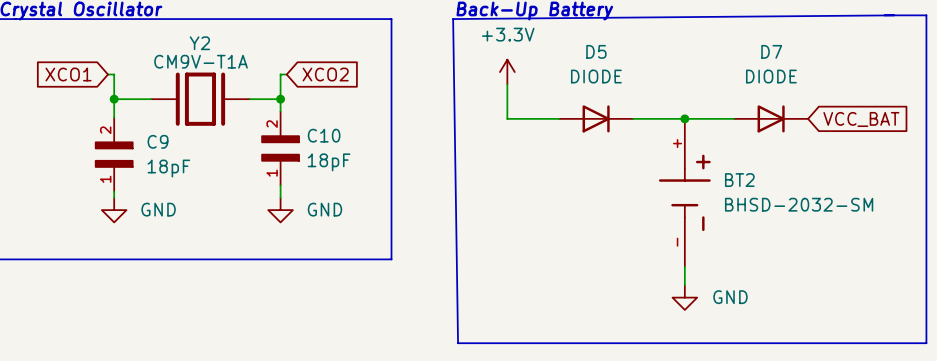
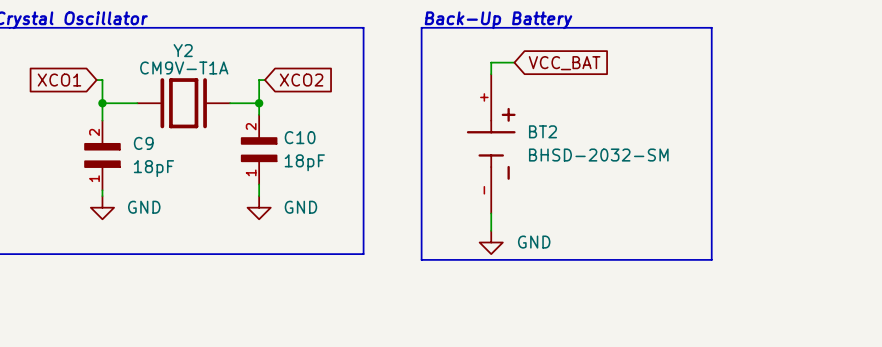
line: (884, 15) (926, 15) (926, 343) (458, 343) (453, 19) (894, 15) -> none
line: none -> (421, 27) (421, 259) (711, 259) (711, 27) (421, 27)
wire: none -> (514, 62) (491, 62) (491, 74)
global label: none -> VCC_BAT (564, 63)
power symbol: +3.3V (507, 72) -> none
wire: (507, 84) (507, 118) (559, 118) -> none
D5: DIODE (596, 118) -> none
wire: (633, 118) (734, 118) -> none
junction: (684, 118) -> none
D7: DIODE (771, 118) -> none
global label: VCC_BAT (861, 119) -> none
BT2 position: (684, 192) -> (491, 143)
wire: (684, 266) (684, 285) -> (491, 213) (491, 230)
power symbol position: GND (684, 297) -> GND (491, 242)

